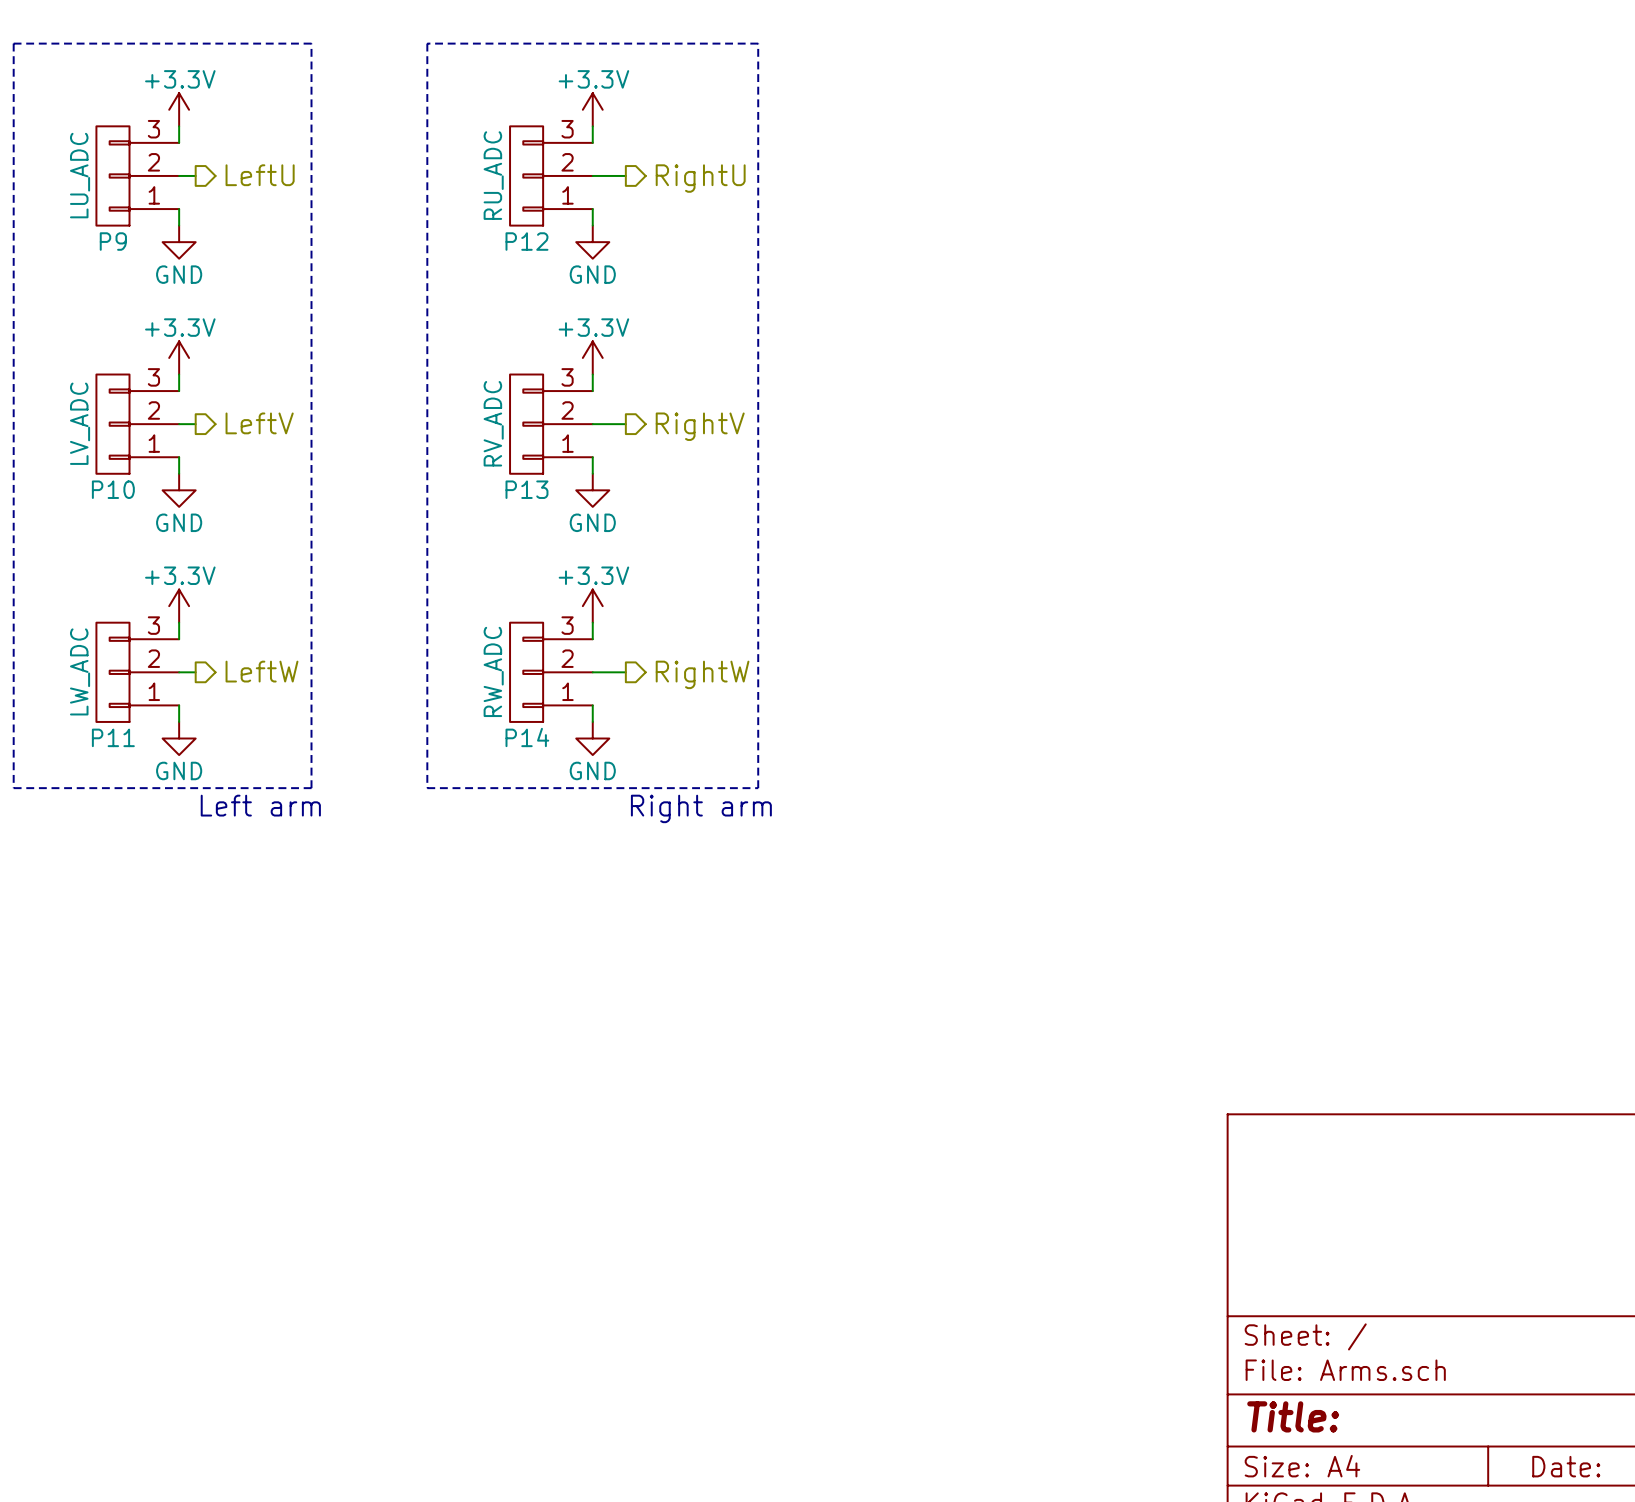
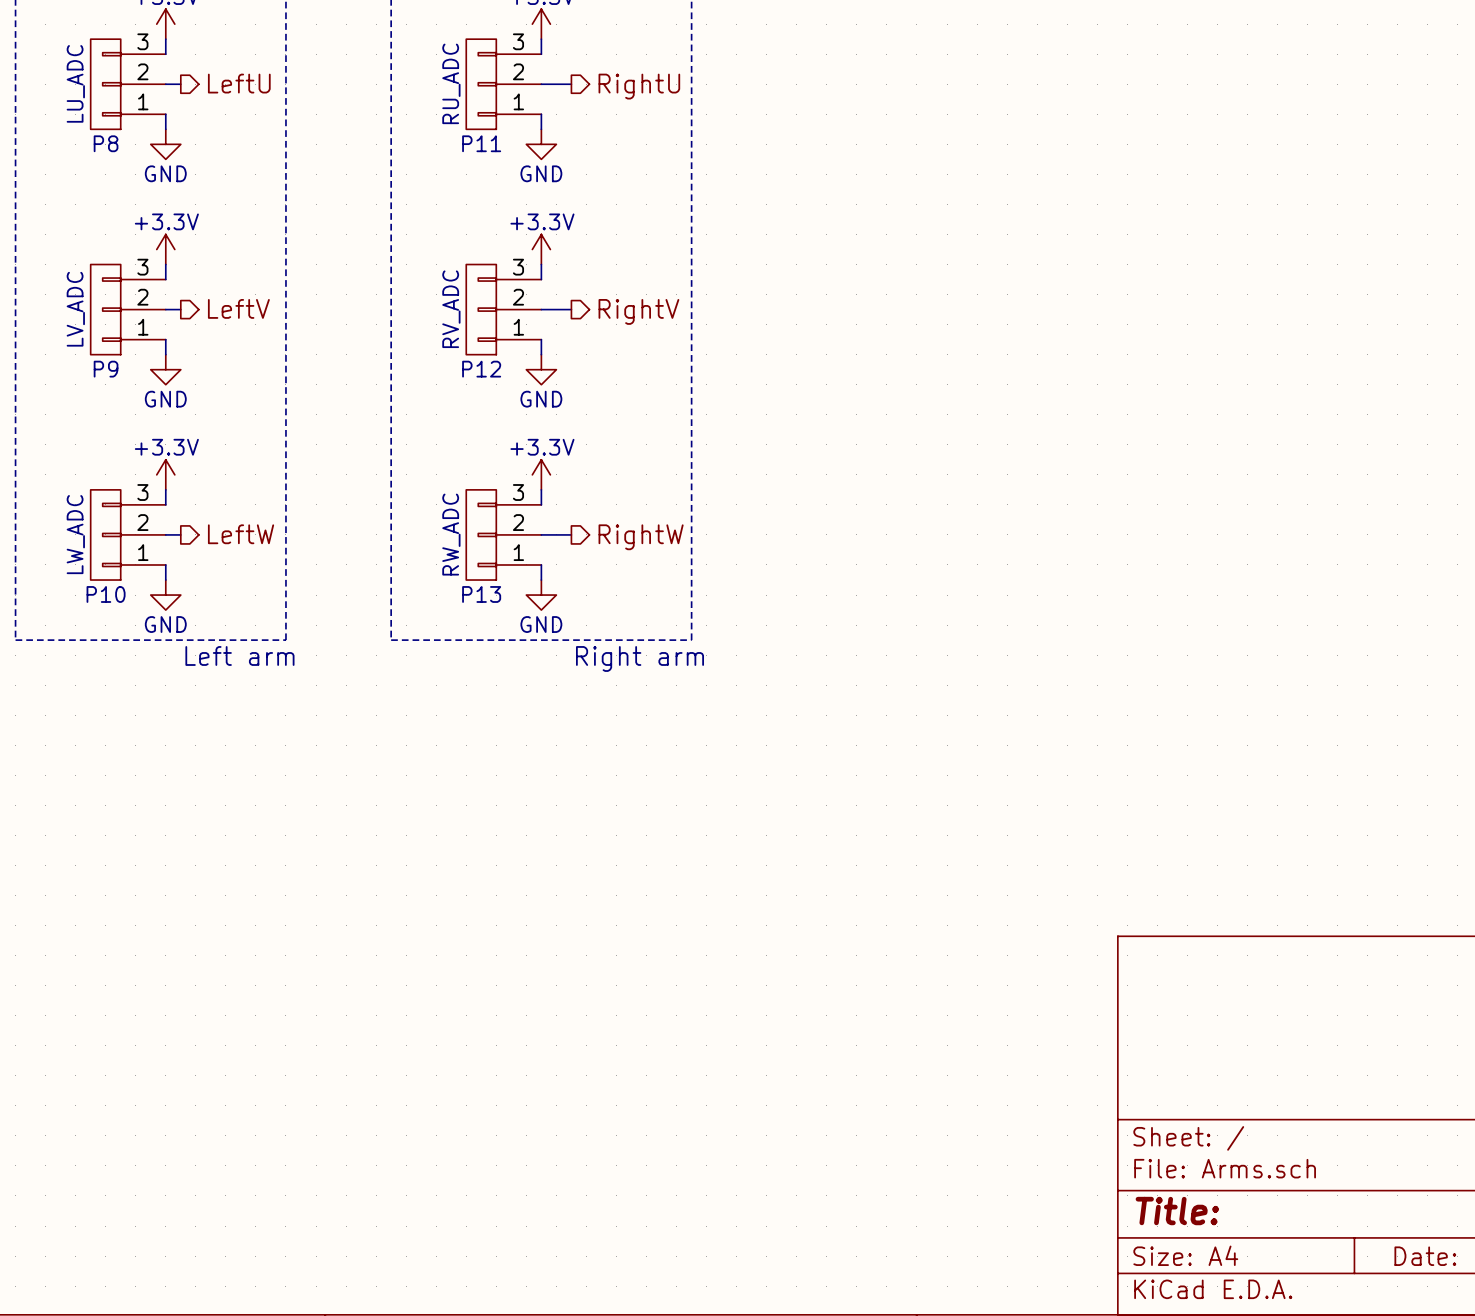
P9 name: P9 (113, 241) -> P8 (106, 143)
P12 name: P12 (526, 241) -> P11 (481, 143)
P10 name: P10 (113, 489) -> P9 (106, 369)
P13 name: P13 (526, 489) -> P12 (481, 369)
P11 name: P11 (113, 737) -> P10 (106, 594)
P14 name: P14 (527, 737) -> P13 (481, 594)

